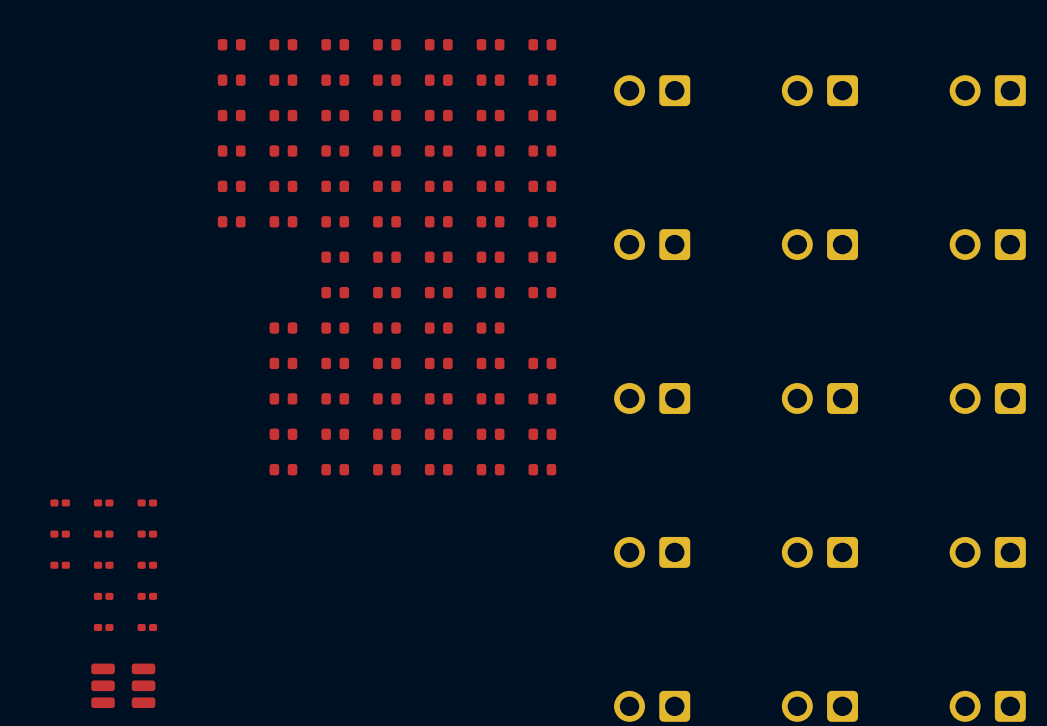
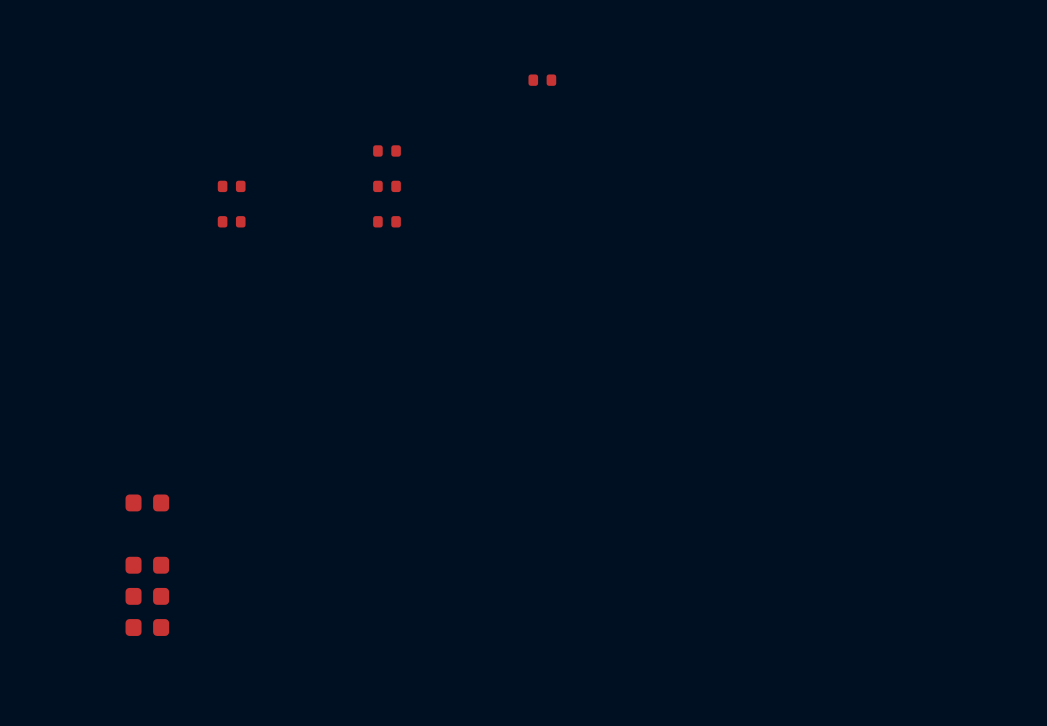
part: (231, 44) -> none
part: (283, 44) -> none
part: (335, 44) -> none
part: (387, 44) -> none
part: (438, 44) -> none
part: (490, 44) -> none
part: (542, 44) -> none
part: (231, 80) -> none
part: (283, 80) -> none
part: (335, 80) -> none
part: (387, 80) -> none
part: (438, 80) -> none
part: (490, 80) -> none
part: (652, 90) -> none
part: (819, 90) -> none
part: (987, 90) -> none
part: (231, 115) -> none
part: (283, 115) -> none
part: (335, 115) -> none
part: (387, 115) -> none
part: (438, 115) -> none
part: (490, 115) -> none
part: (542, 115) -> none
part: (231, 150) -> none
part: (283, 150) -> none
part: (335, 150) -> none
part: (438, 150) -> none
part: (490, 150) -> none
part: (542, 150) -> none
part: (283, 186) -> none
part: (335, 186) -> none
part: (438, 186) -> none
part: (490, 186) -> none
part: (542, 186) -> none
part: (283, 221) -> none
part: (335, 221) -> none
part: (438, 221) -> none
part: (490, 221) -> none
part: (542, 221) -> none
part: (652, 244) -> none
part: (819, 244) -> none
part: (987, 244) -> none
part: (335, 257) -> none
part: (387, 257) -> none
part: (438, 257) -> none
part: (490, 257) -> none
part: (542, 257) -> none
part: (335, 292) -> none
part: (387, 292) -> none
part: (438, 292) -> none
part: (490, 292) -> none
part: (542, 292) -> none
part: (283, 328) -> none
part: (335, 328) -> none
part: (387, 328) -> none
part: (438, 328) -> none
part: (490, 328) -> none
part: (283, 363) -> none
part: (335, 363) -> none
part: (387, 363) -> none
part: (438, 363) -> none
part: (490, 363) -> none
part: (542, 363) -> none
part: (283, 398) -> none
part: (335, 398) -> none
part: (387, 398) -> none
part: (438, 398) -> none
part: (490, 398) -> none
part: (542, 398) -> none
part: (652, 398) -> none
part: (819, 398) -> none
part: (987, 398) -> none
part: (283, 434) -> none
part: (335, 434) -> none
part: (387, 434) -> none
part: (438, 434) -> none
part: (490, 434) -> none
part: (542, 434) -> none
part: (283, 469) -> none
part: (335, 469) -> none
part: (387, 469) -> none
part: (438, 469) -> none
part: (490, 469) -> none
part: (542, 469) -> none
part footprint: [137, 499, 158, 507] -> [125, 494, 170, 512]
part: (60, 502) -> none
part: (103, 502) -> none
part: (60, 534) -> none
part: (103, 534) -> none
part: (147, 534) -> none
part: (652, 552) -> none
part: (819, 552) -> none
part: (987, 552) -> none
part footprint: [137, 561, 158, 569] -> [125, 556, 170, 574]
part: (60, 565) -> none
part: (103, 565) -> none
part footprint: [137, 592, 158, 600] -> [125, 587, 170, 605]
part: (103, 596) -> none
part footprint: [137, 623, 158, 632] -> [125, 619, 170, 636]
part: (103, 627) -> none
part: (123, 685) -> none
part: (652, 706) -> none
part: (819, 706) -> none
part: (987, 706) -> none

